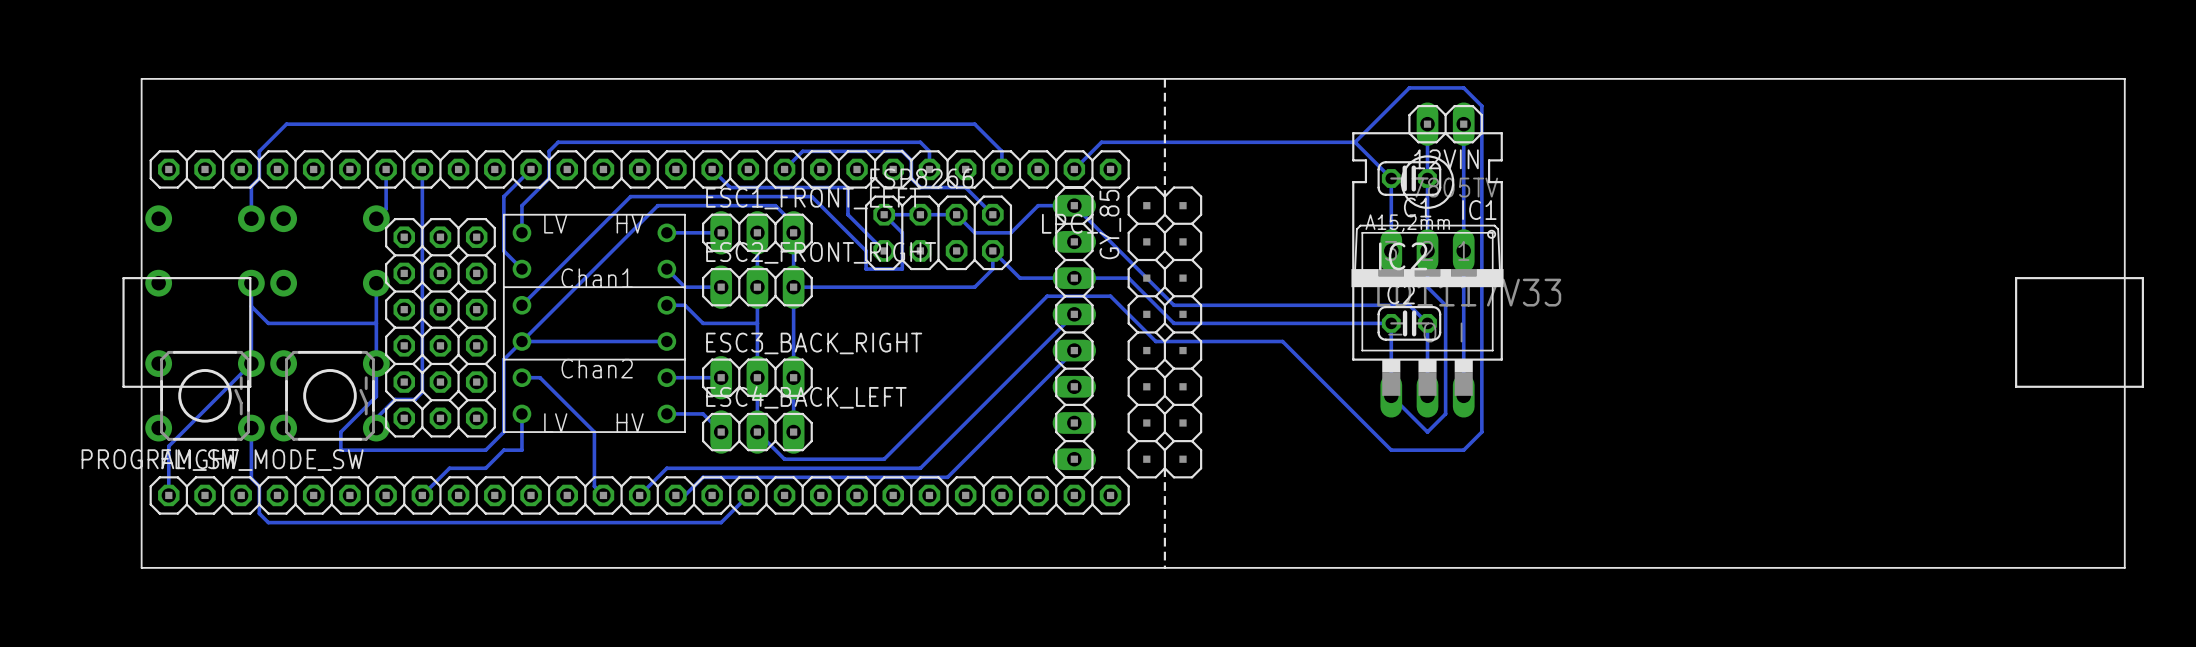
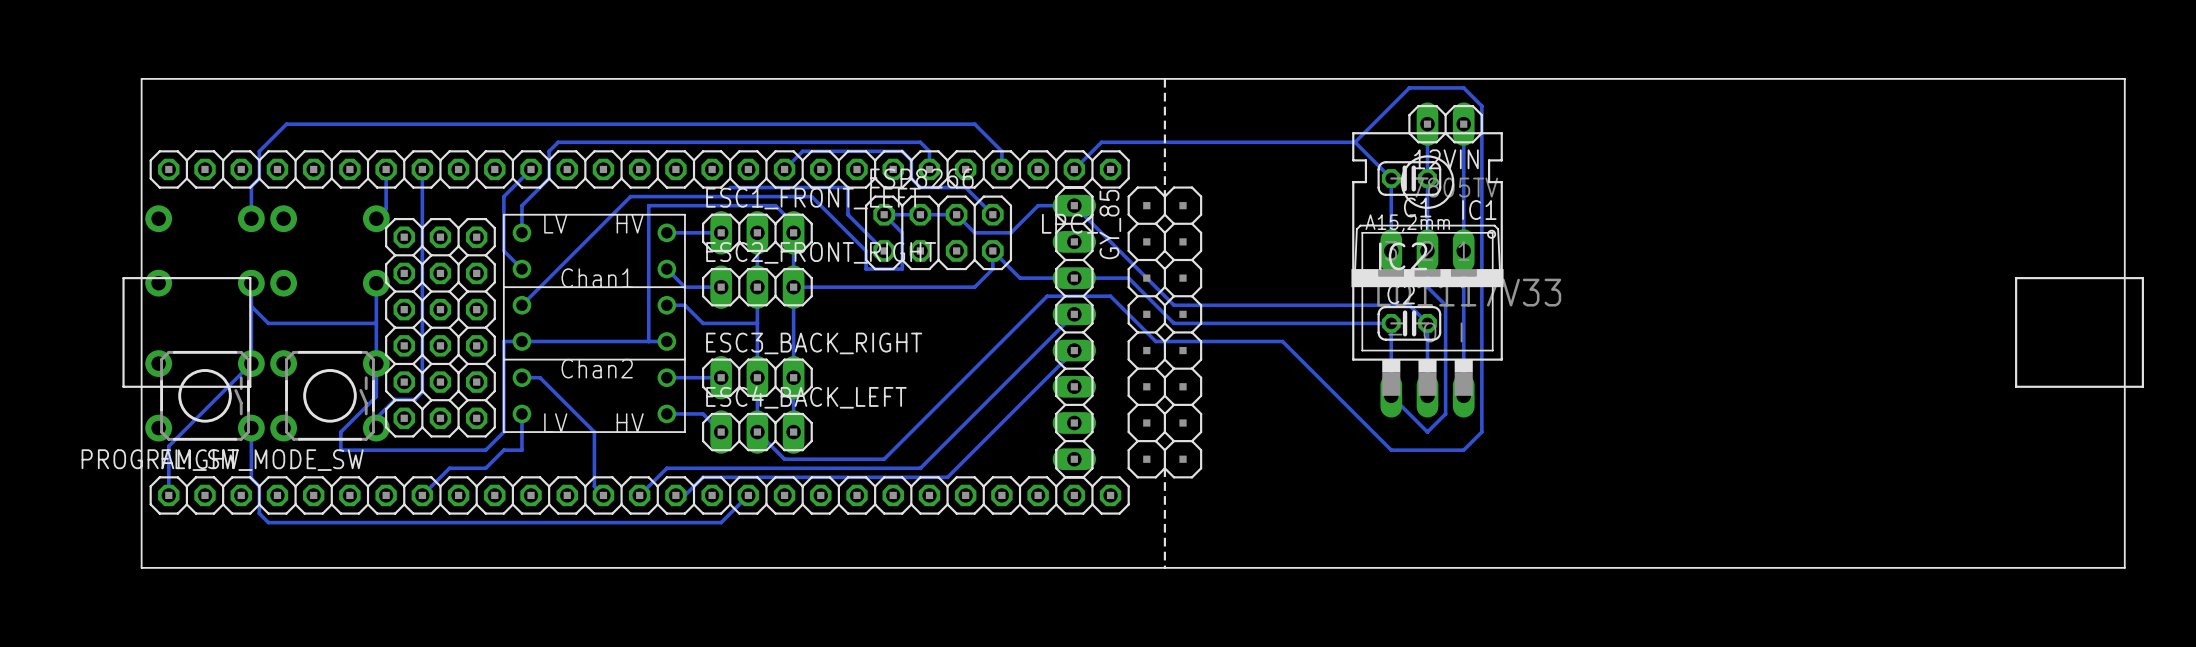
bottom track: (712, 169) (730, 187) -> none
bottom track: (657, 205) (503, 359) -> (657, 205) (648, 205) (648, 341)
bottom track: none -> (521, 341) (503, 341) (503, 359)

